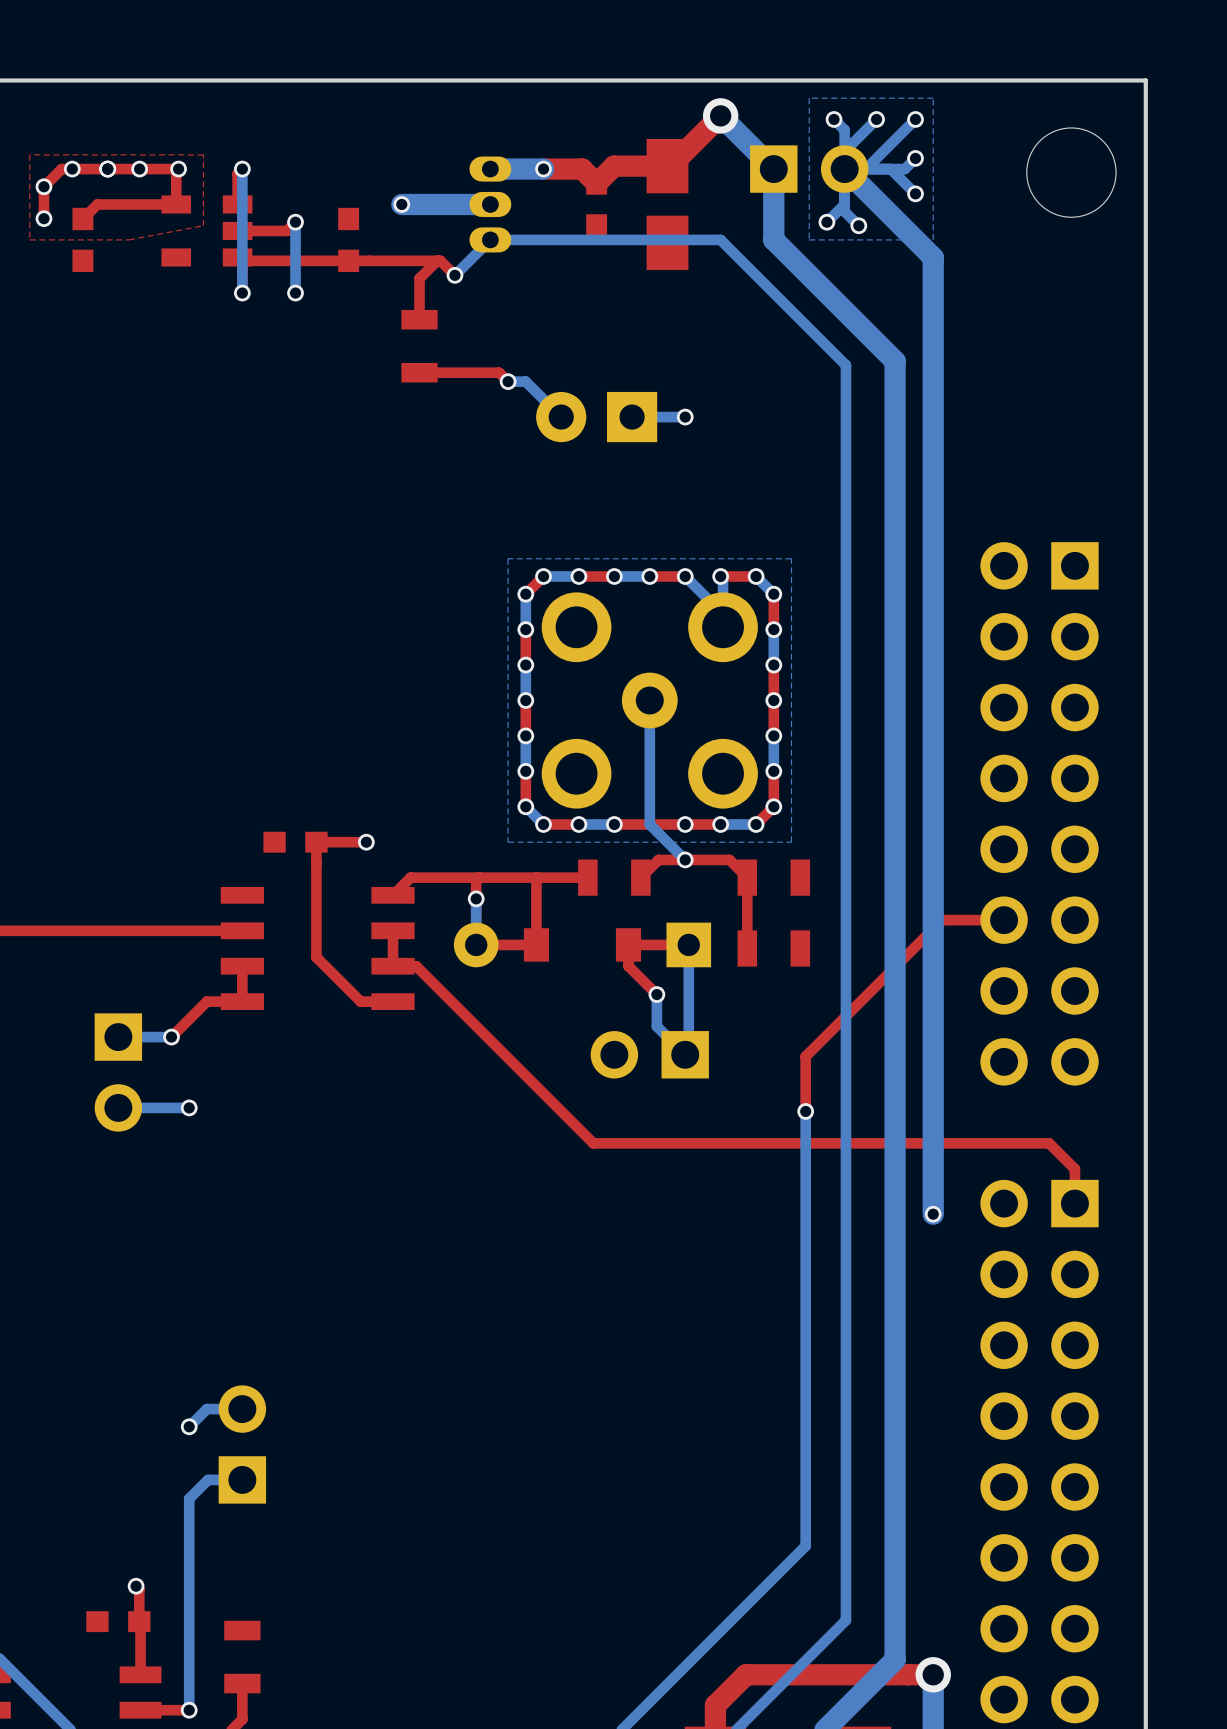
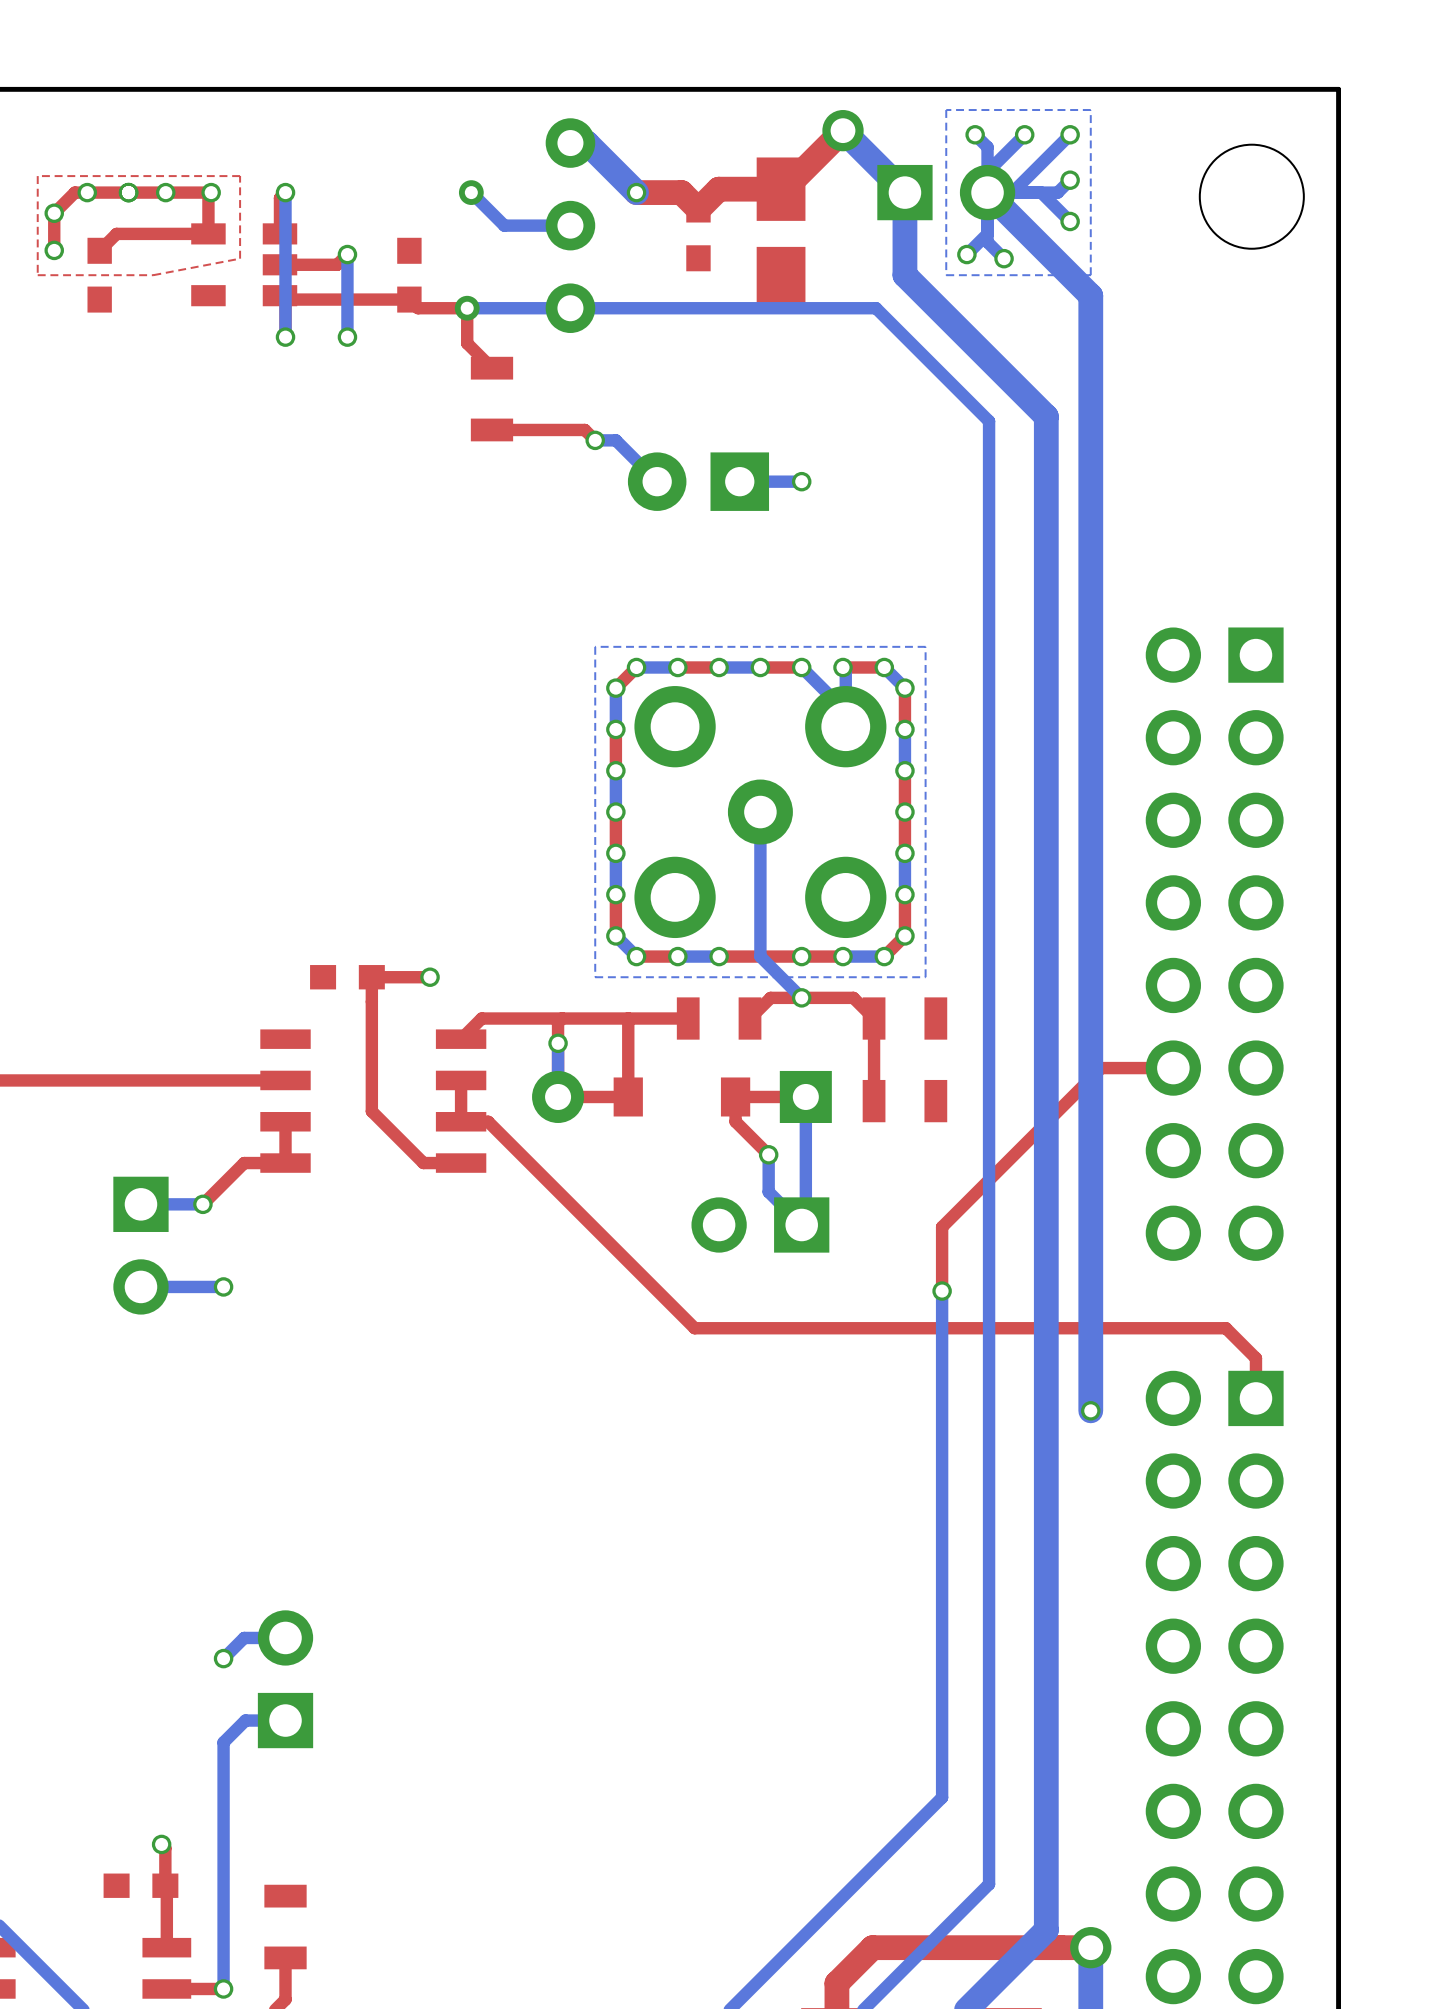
part footprint: [469, 156, 512, 253] -> [545, 118, 596, 334]
bottom track: none -> (471, 192) (504, 225) (570, 225)
via: none -> (471, 192)
bottom track: (543, 169) (490, 169) -> (636, 192) (586, 143) (570, 143)
via: (401, 204) -> none
bottom track: (490, 204) (401, 204) -> none
top track: (348, 260) (440, 260) (454, 275) -> (409, 299) (418, 308) (467, 308) (467, 343) (491, 368)
top track: (437, 260) (419, 278) (419, 319) -> none
via: none -> (467, 308)
bottom track: (749, 268) (720, 239) (490, 239) (454, 275) -> (876, 308) (467, 308)
via: (454, 275) -> none

